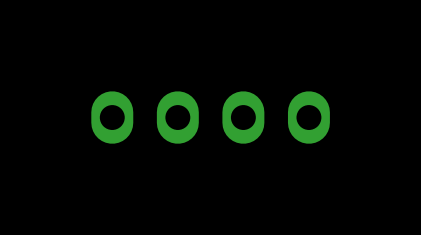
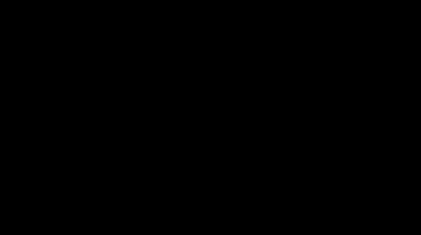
part: (210, 117) -> none

